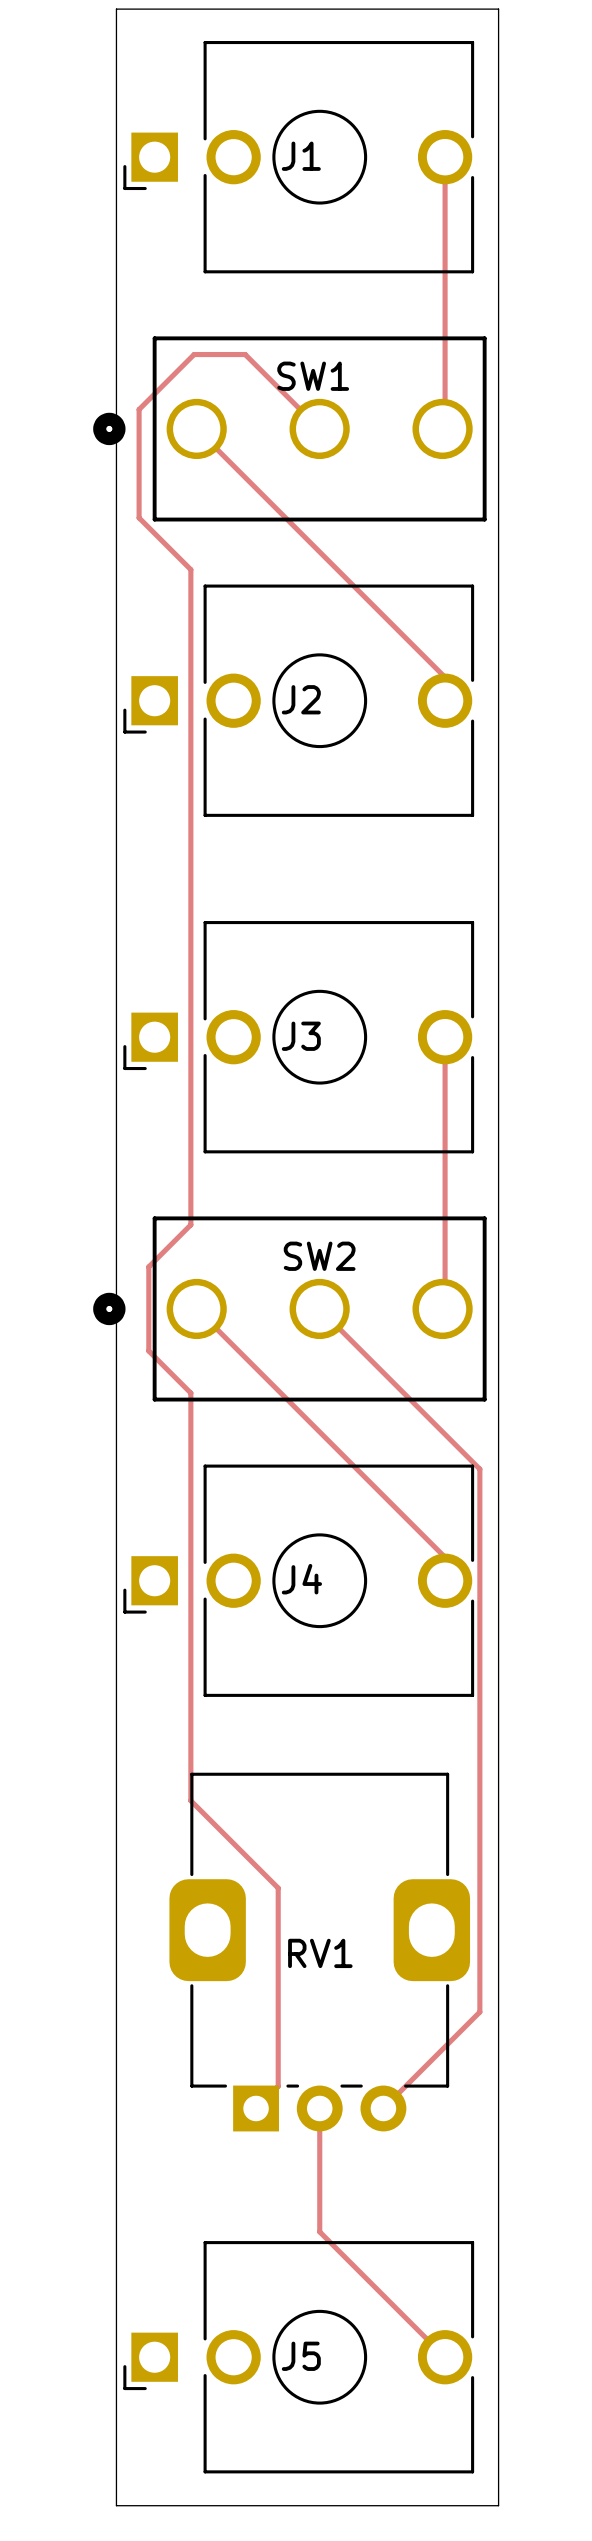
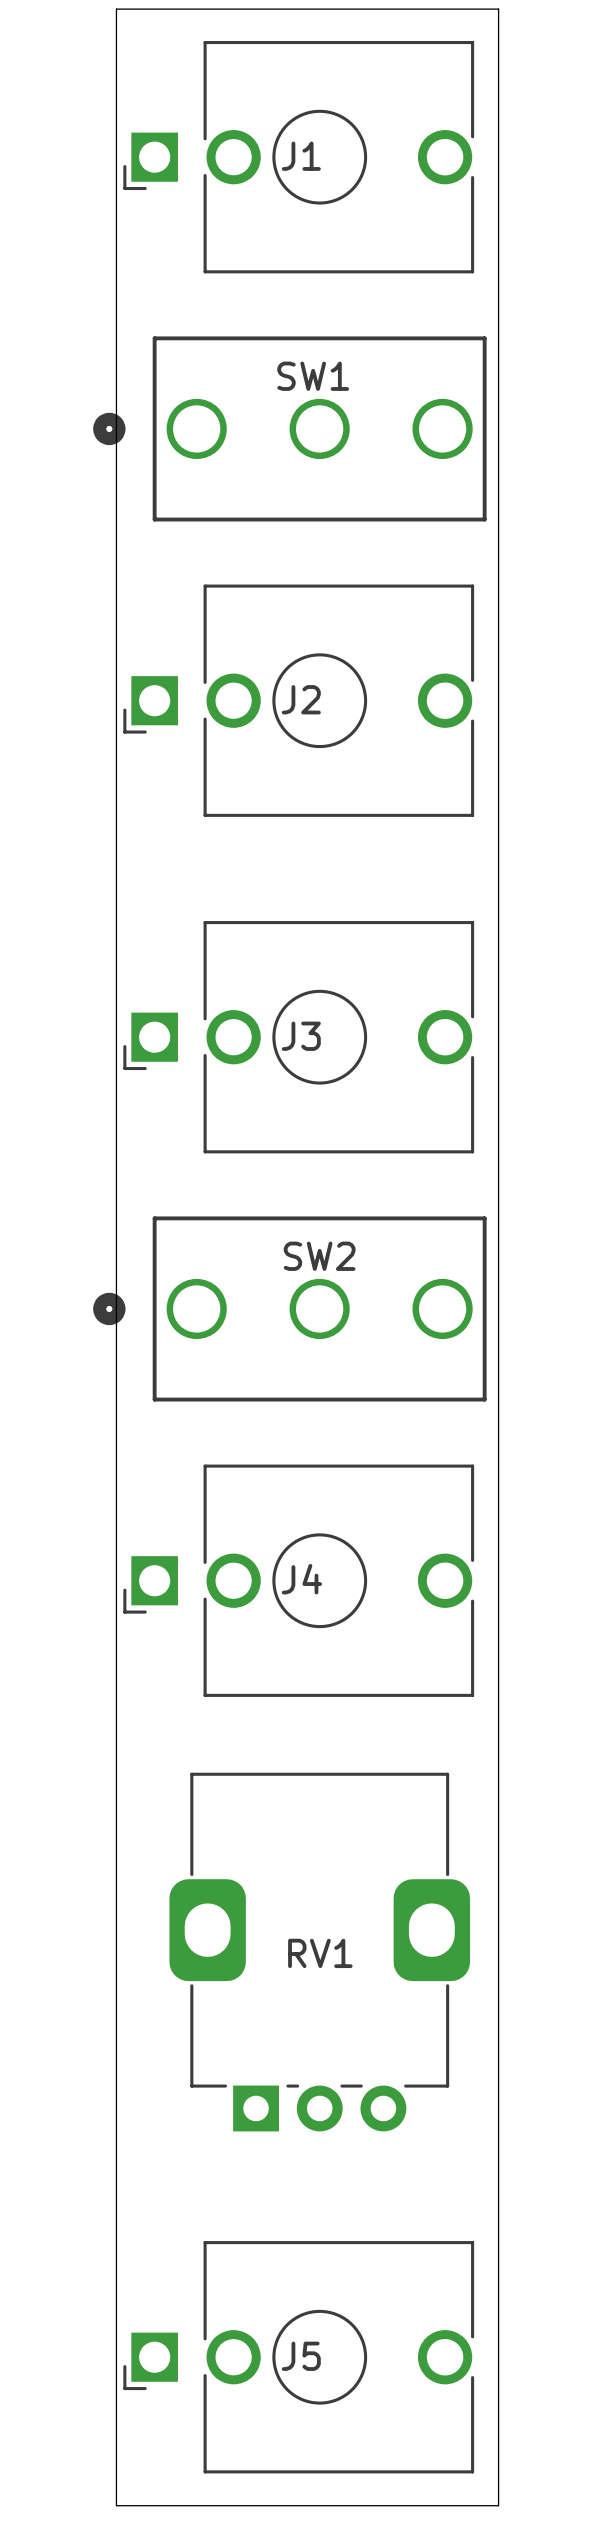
track: (445, 157) (445, 426) (442, 428) -> none
track: (196, 428) (445, 677) (445, 700) -> none
track: (319, 428) (245, 354) (194, 354) (139, 409) (139, 517) (190, 569) (190, 1224) (148, 1266) (148, 1351) (190, 1393) (190, 1800) (278, 1888) (278, 2086) (256, 2108) -> none
track: (445, 1037) (445, 1306) (442, 1308) -> none
track: (196, 1308) (445, 1557) (445, 1580) -> none
track: (319, 1308) (479, 1469) (479, 2012) (383, 2108) -> none
track: (319, 2108) (319, 2231) (445, 2357) -> none

